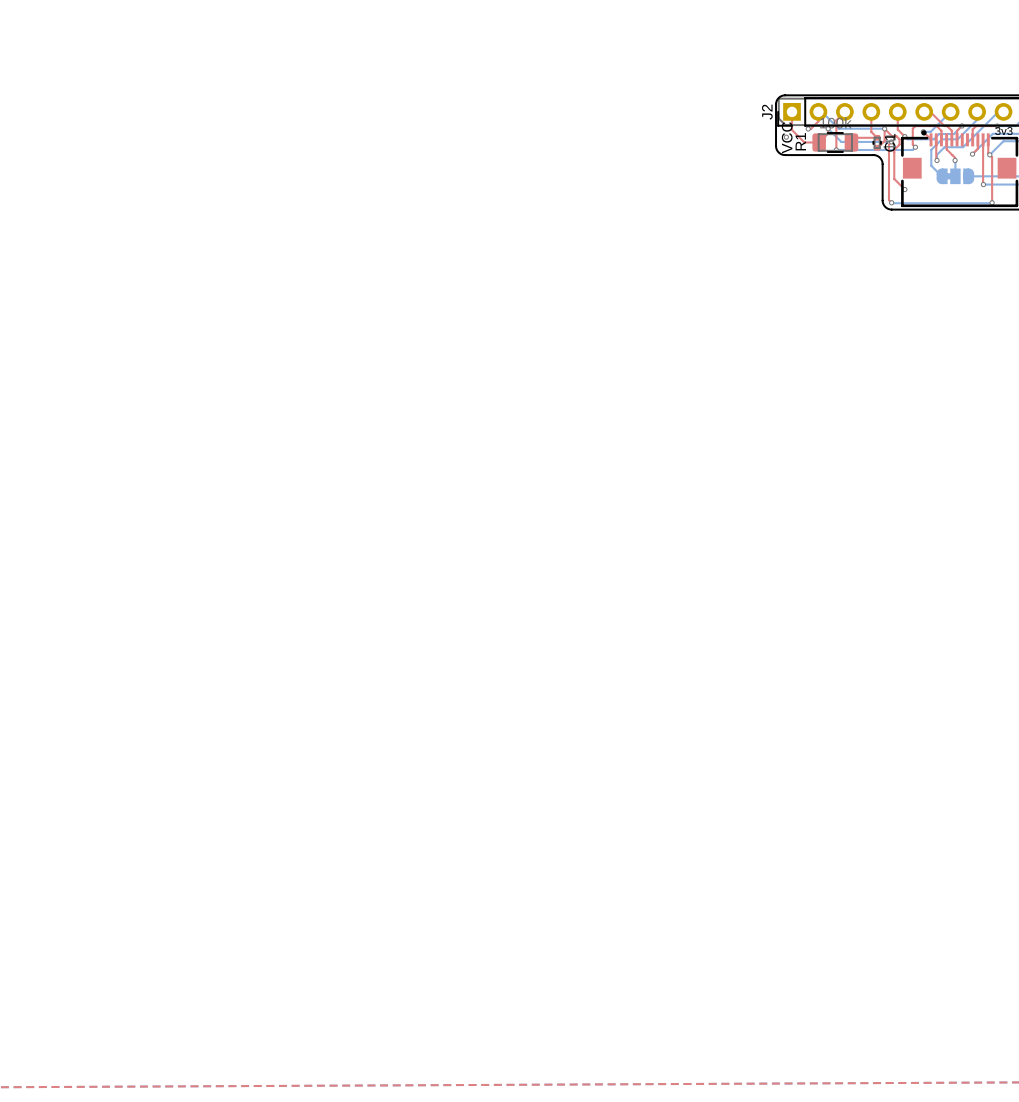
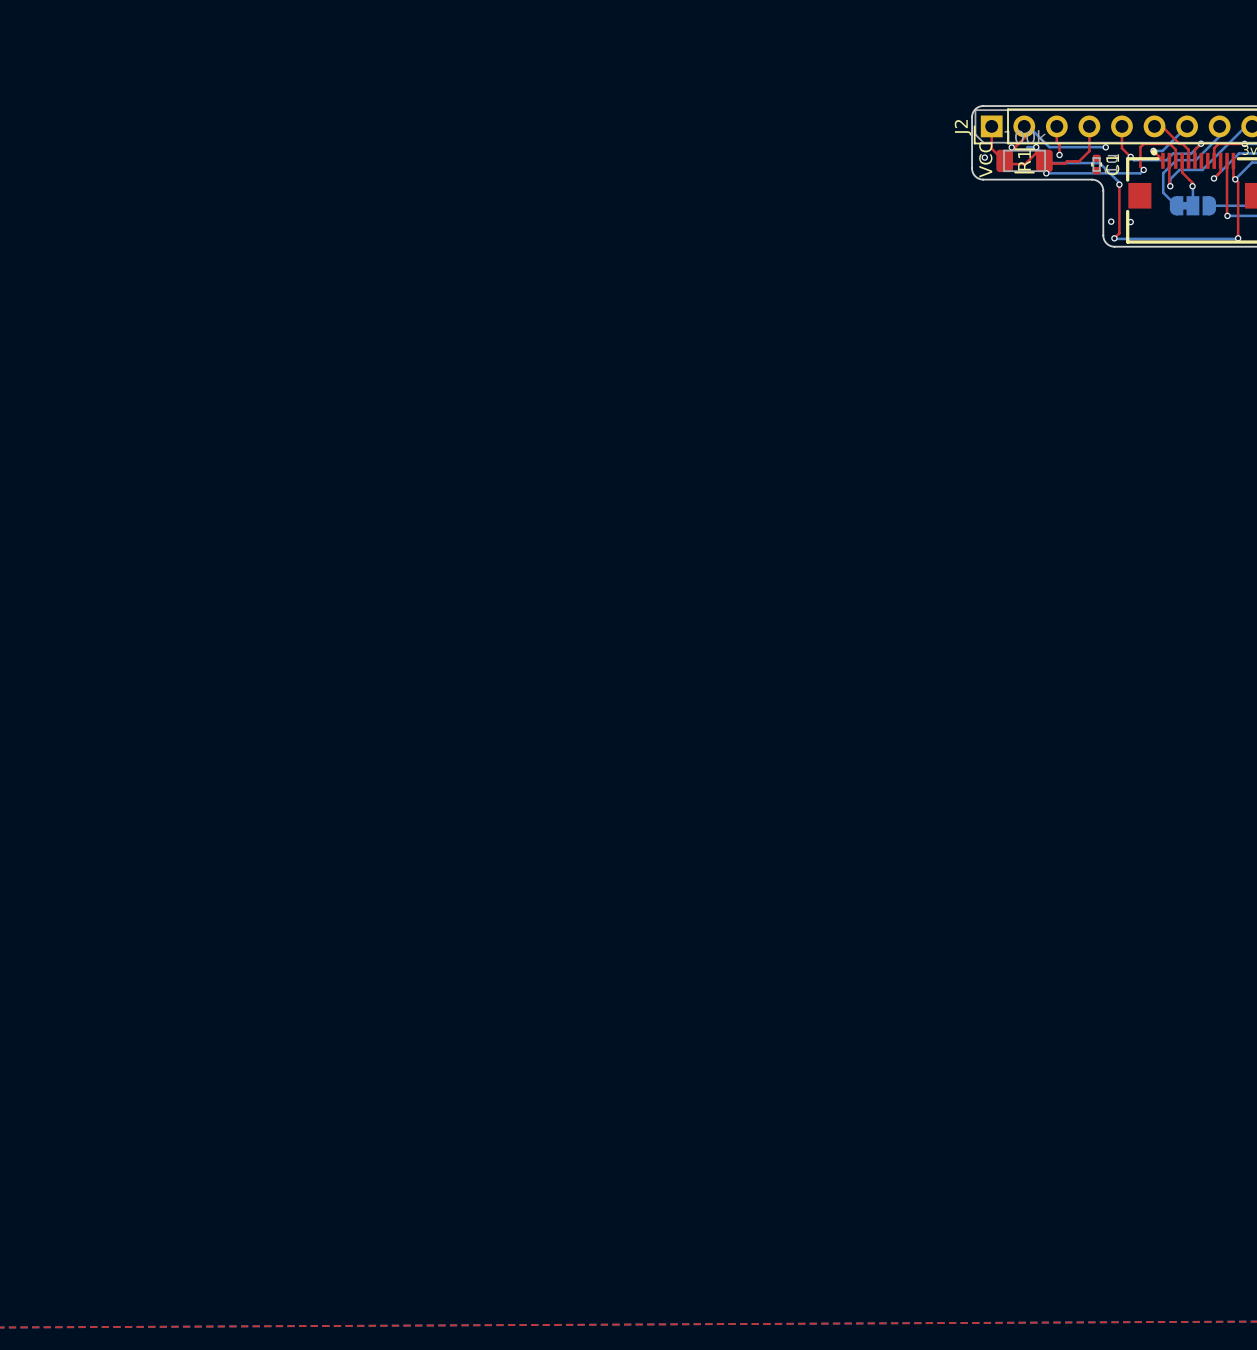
top track: (844, 111) (836, 120) (836, 149) -> (1056, 126) (1059, 155)
bottom track: none -> (1036, 147) (1027, 147)
top track: (871, 131) (877, 137) (856, 137) (851, 142) -> (1089, 151) (1079, 161) (1047, 163) (1044, 160)
via: none -> (1059, 155)
R1 name position: R1 (800, 141) -> R1 (1024, 160)
bottom track: (841, 141) (891, 141) -> (1052, 163) (1099, 163) (1119, 184)
top track: (891, 141) (888, 144) (888, 200) (891, 202) -> (1119, 184) (1119, 233) (1114, 238)
via position: (891, 141) -> (1119, 184)
R1 position: (835, 142) -> (1024, 160)
top track: (877, 147) (884, 140) (884, 128) (892, 136) (896, 136) (899, 139) (899, 144) (894, 149) (894, 178) (904, 189) -> none
via: none -> (1111, 221)

